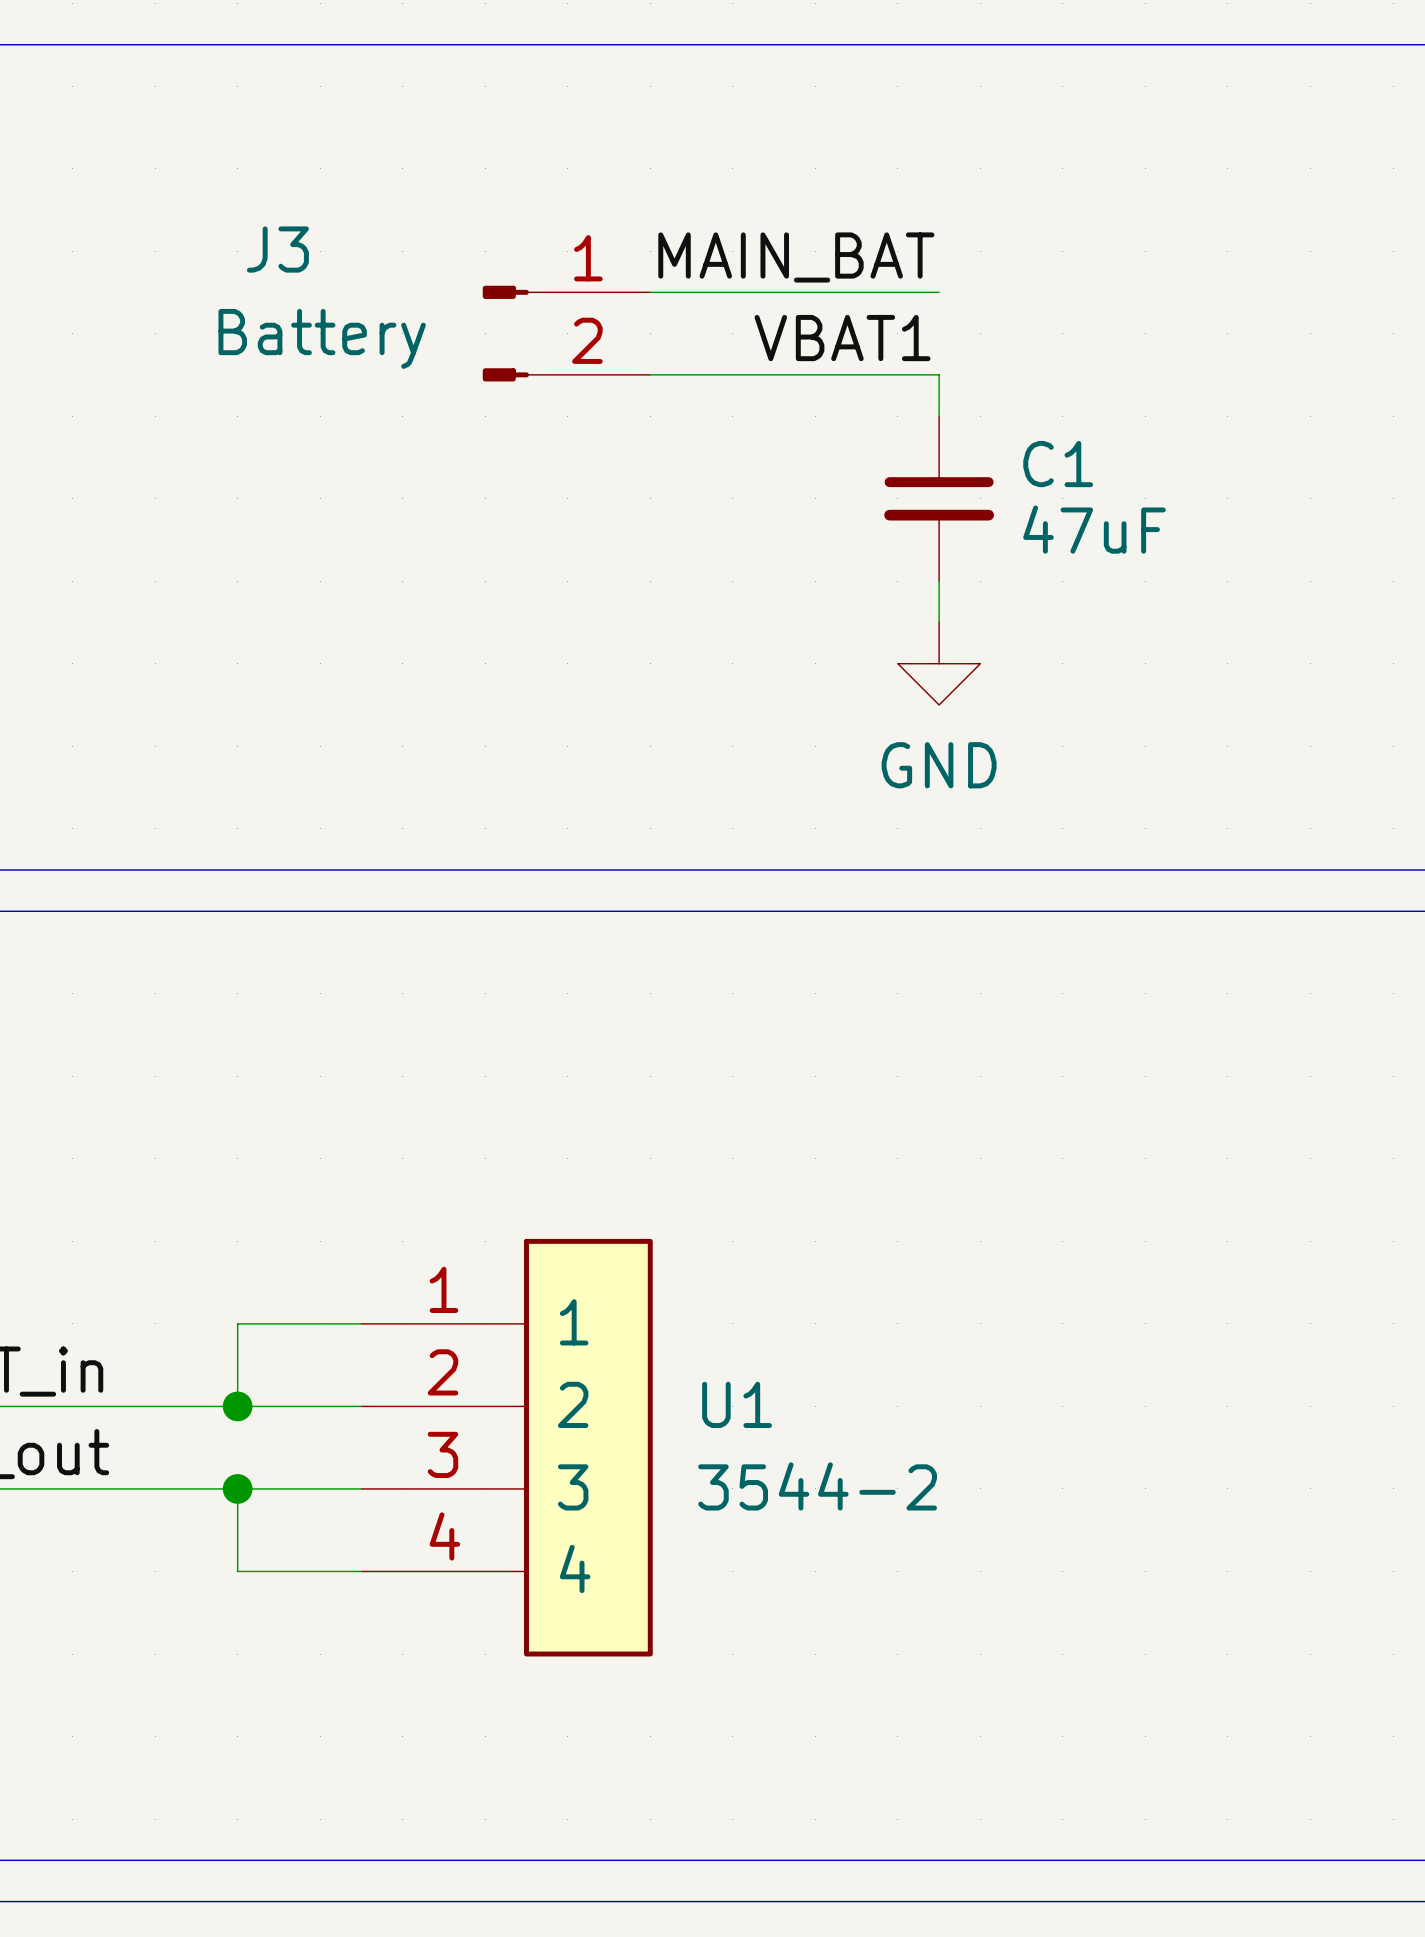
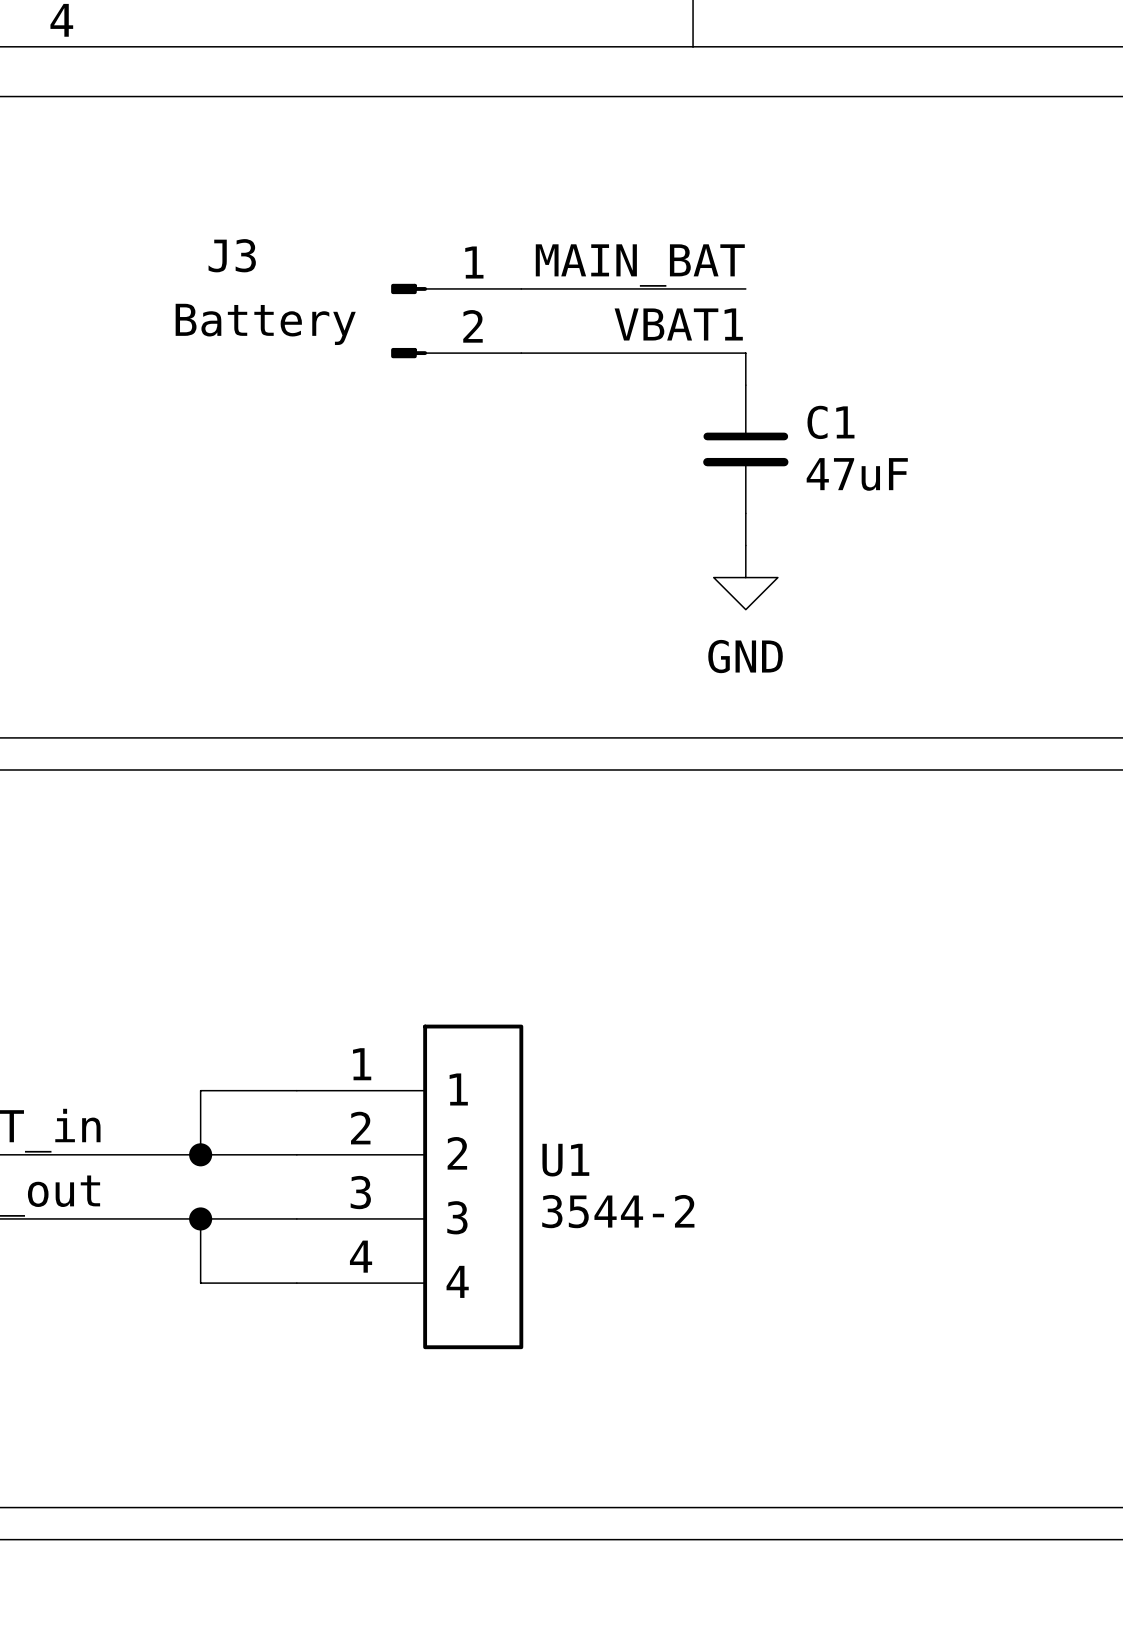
U1 name position: U1 (737, 1404) -> U1 (565, 1160)
U1 value position: 3544-2 (817, 1486) -> 3544-2 (618, 1211)

